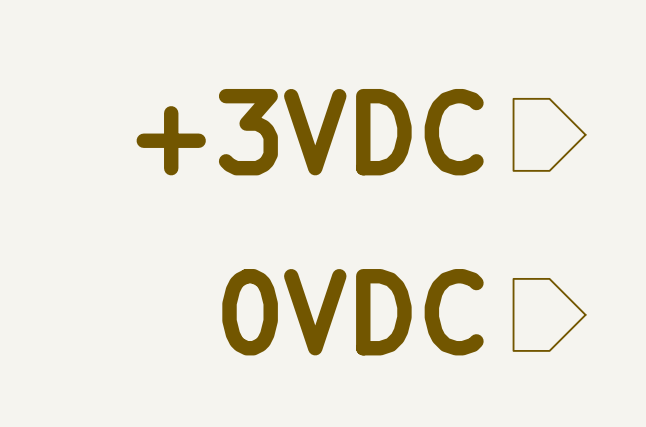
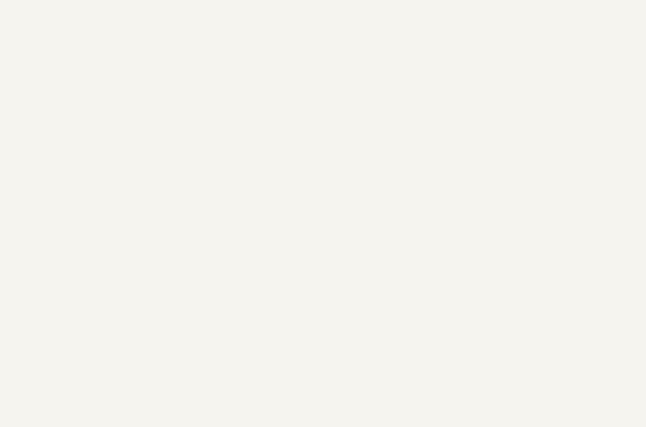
hierarchical label: +3VDC (310, 132) -> none
hierarchical label: 0VDC (352, 312) -> none

